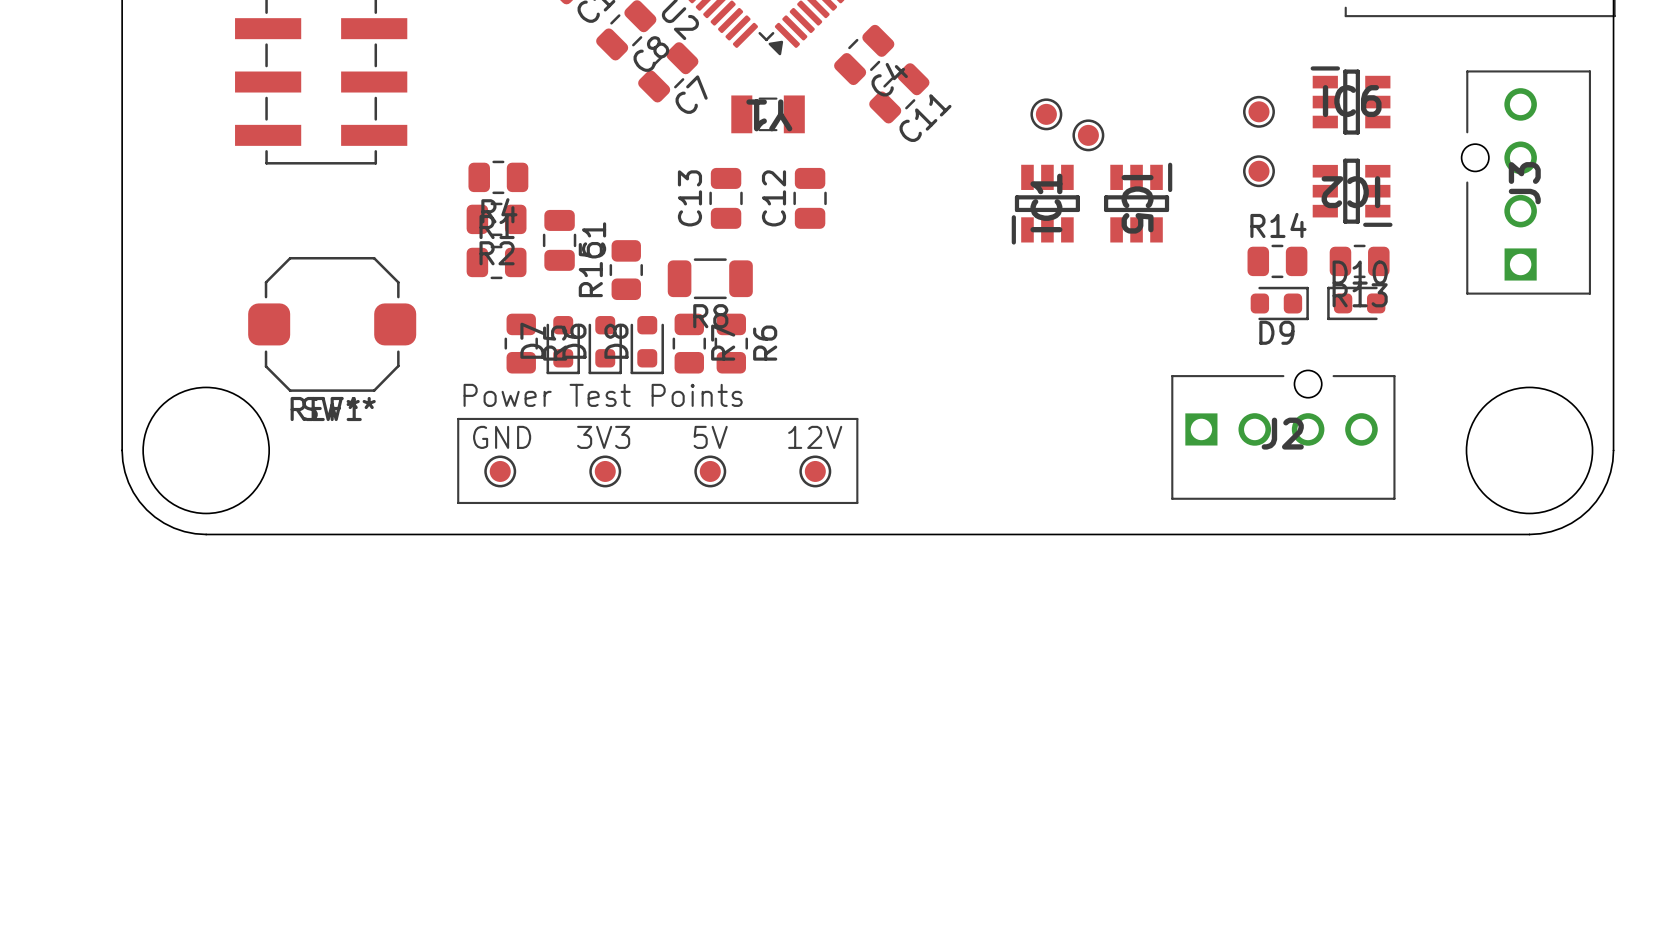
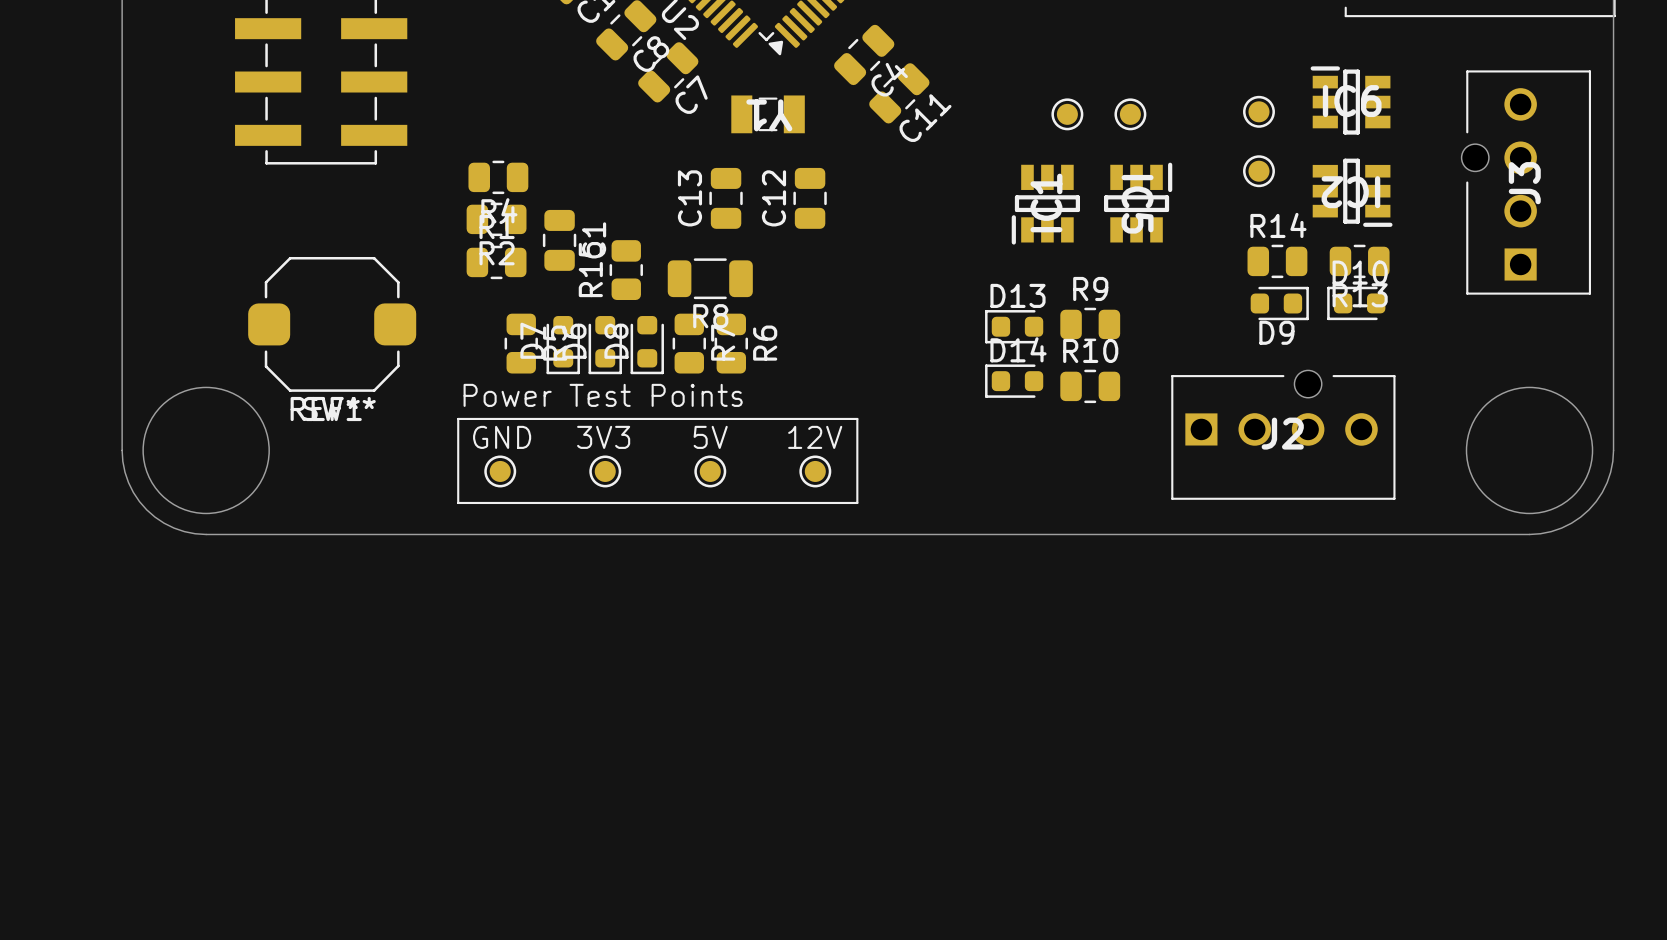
part: (1046, 114) -> none
part: none -> (1067, 114)
part: none -> (1130, 114)
part: (1088, 135) -> none
R9: none -> (1090, 324)
D13: none -> (1014, 326)
D14: none -> (1014, 381)
R10: none -> (1090, 386)

